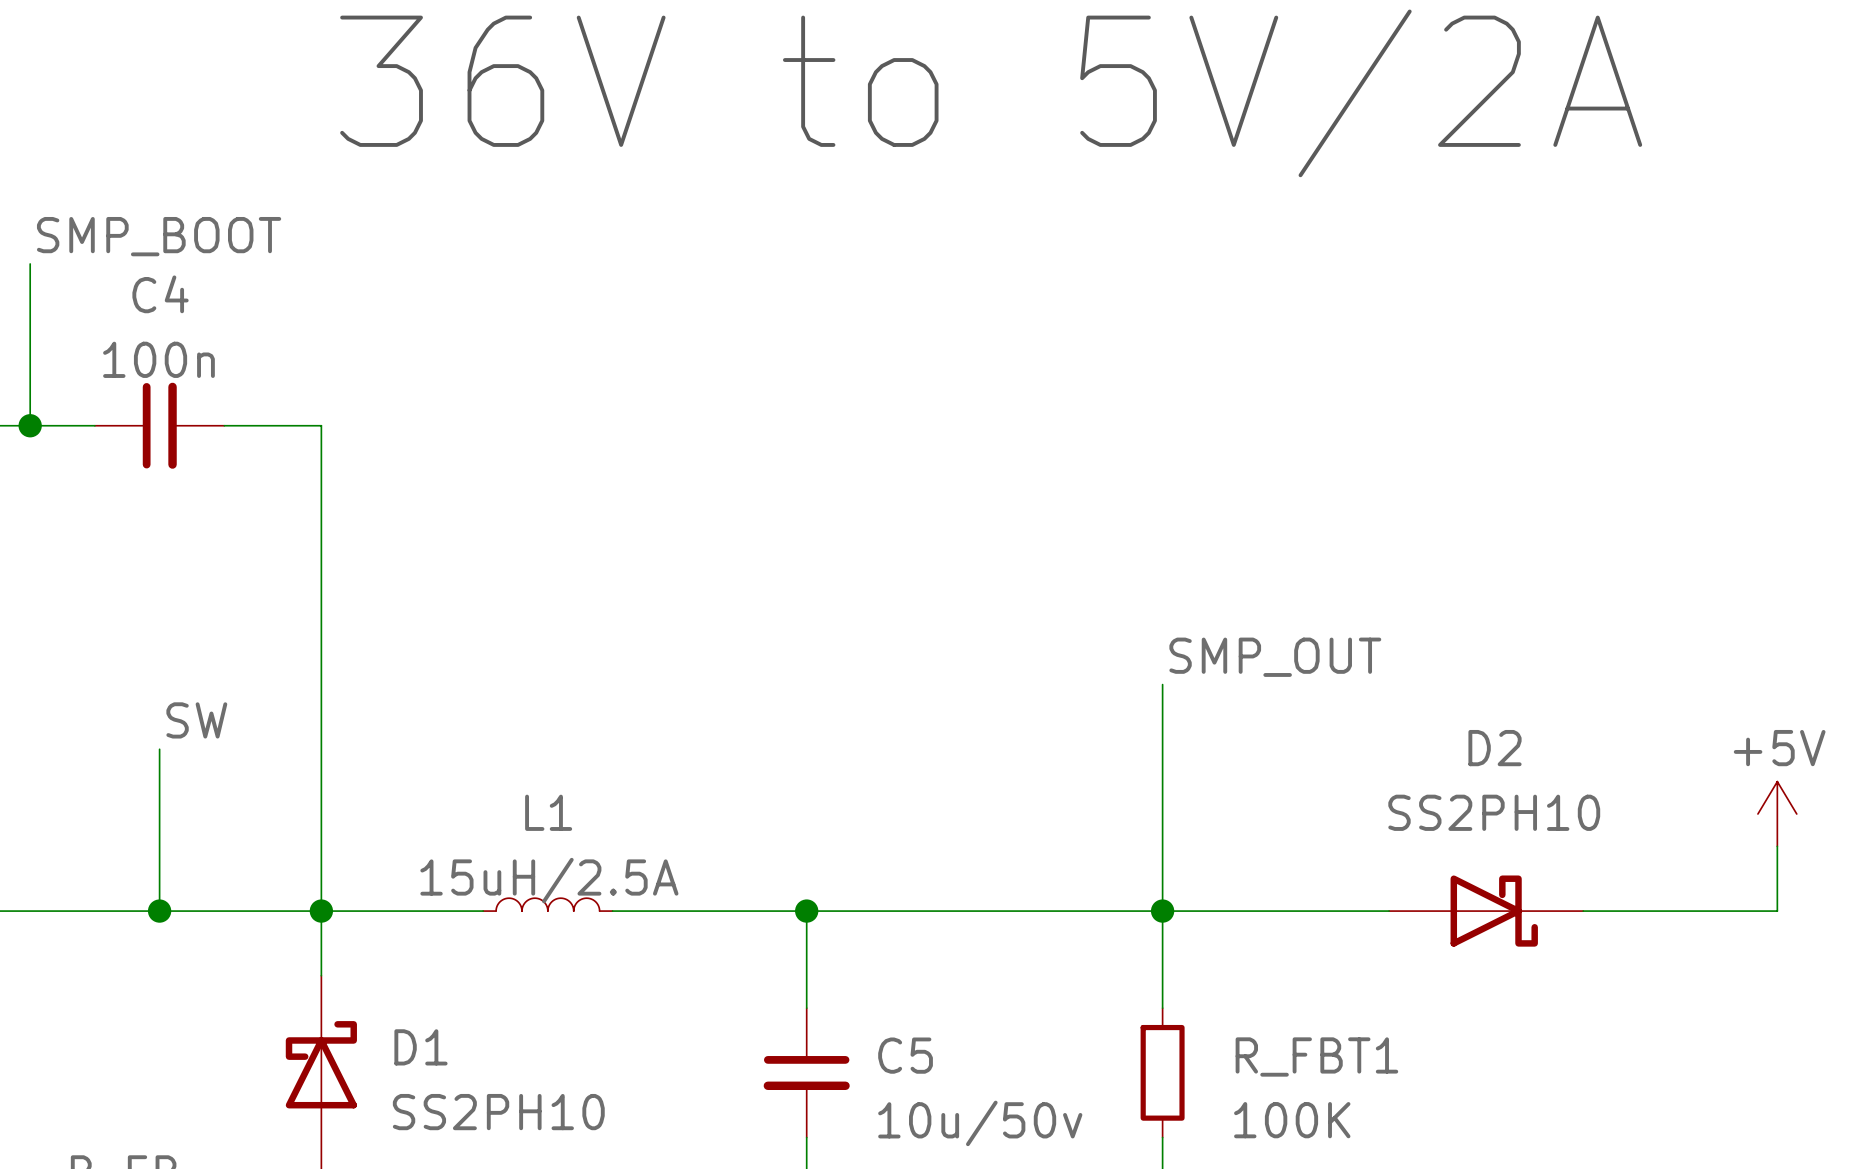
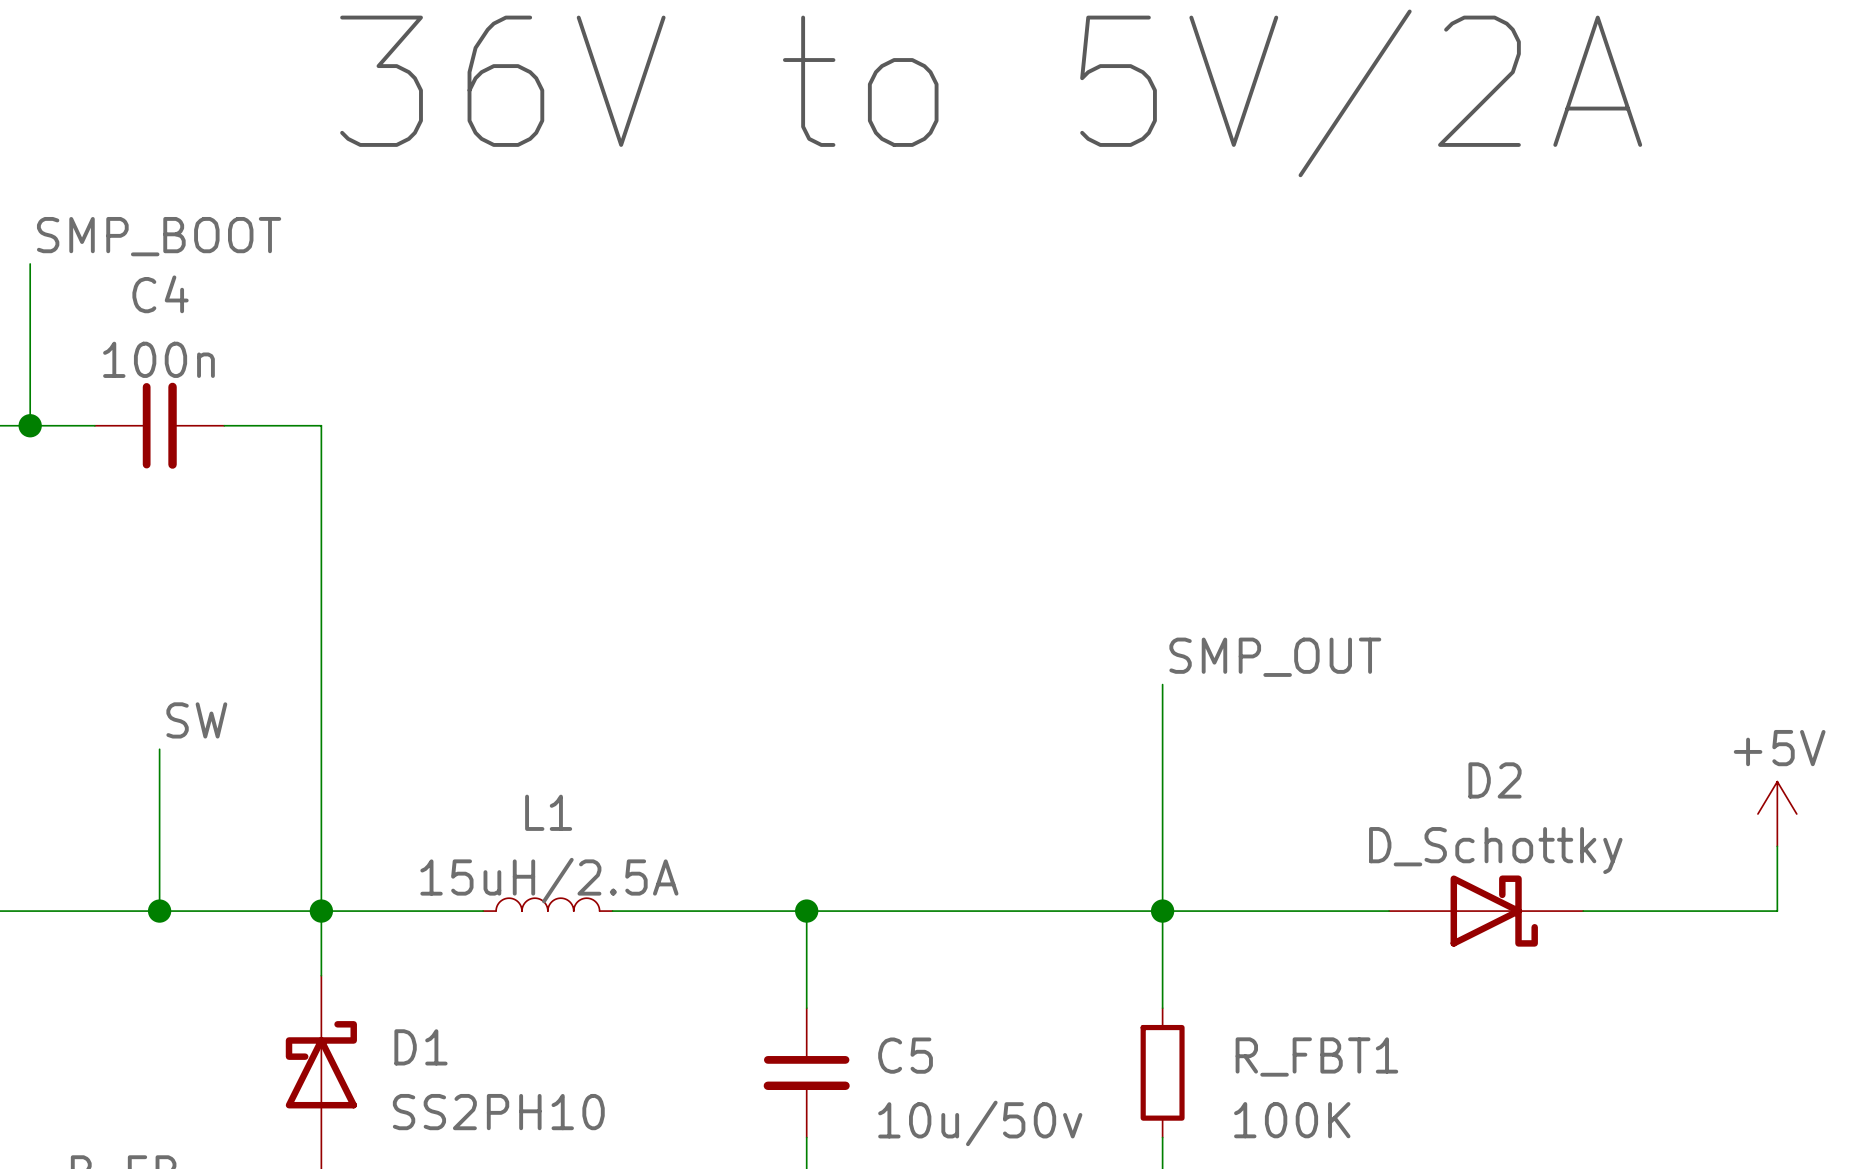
D2 name position: D2 (1495, 748) -> D2 (1495, 780)
D2 value: SS2PH10 (1494, 812) -> D_Schottky (1495, 850)

